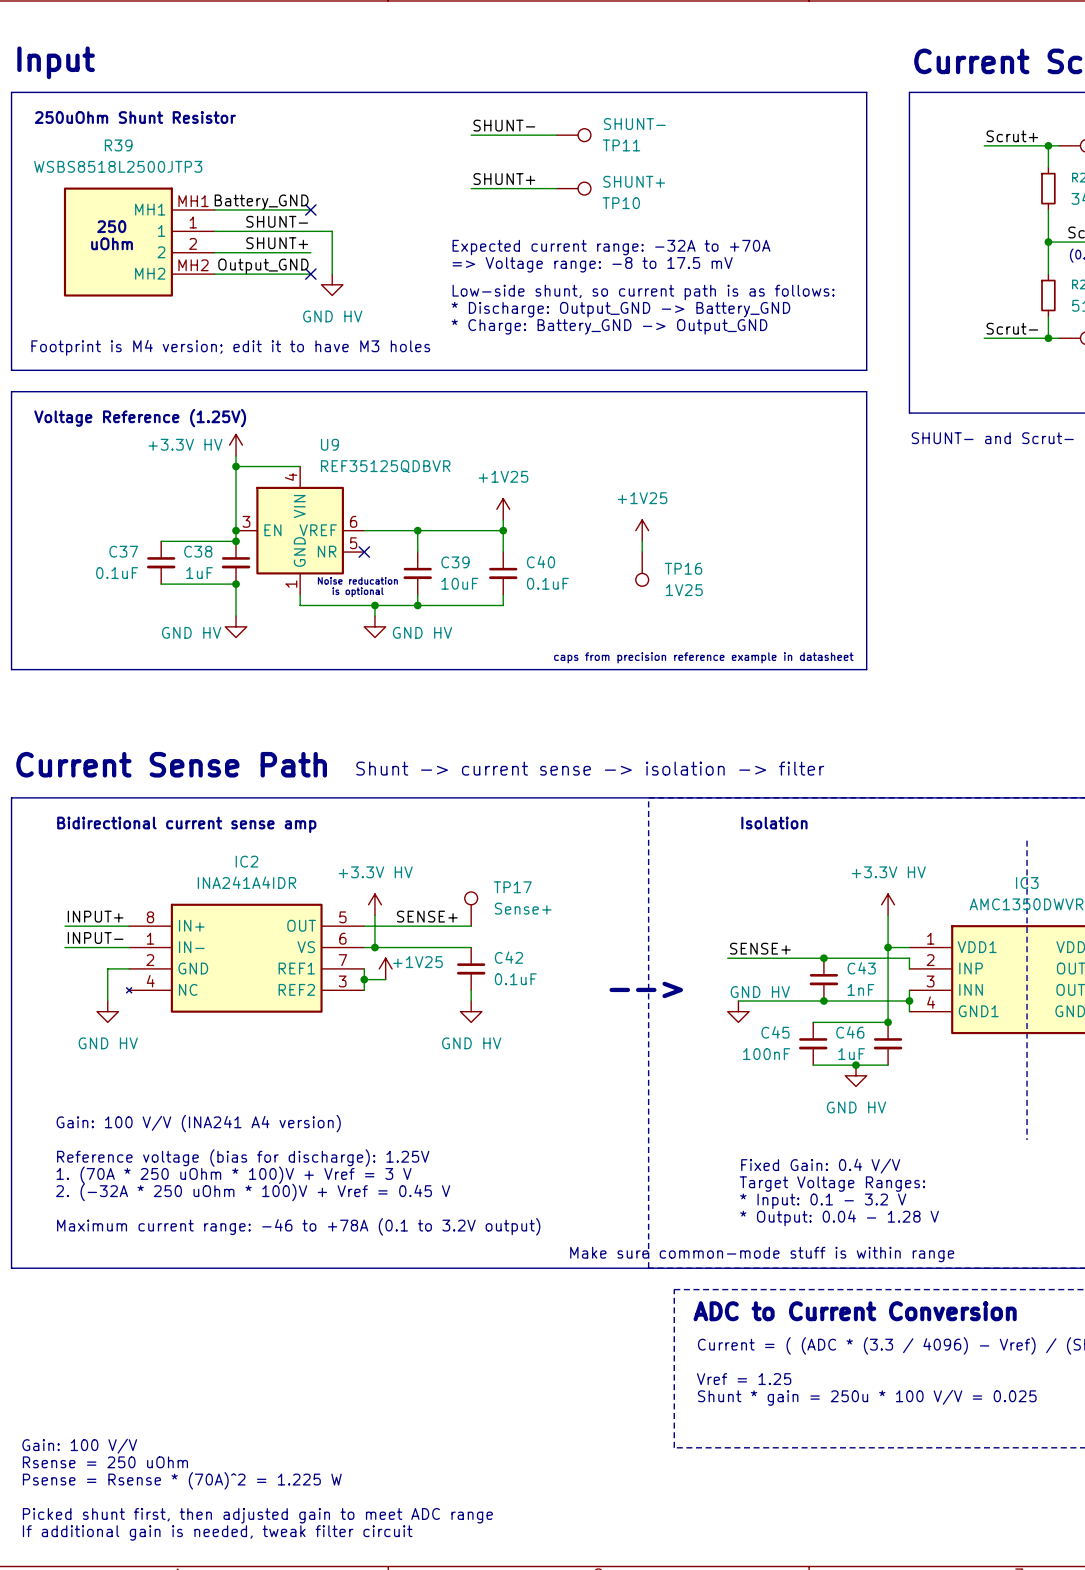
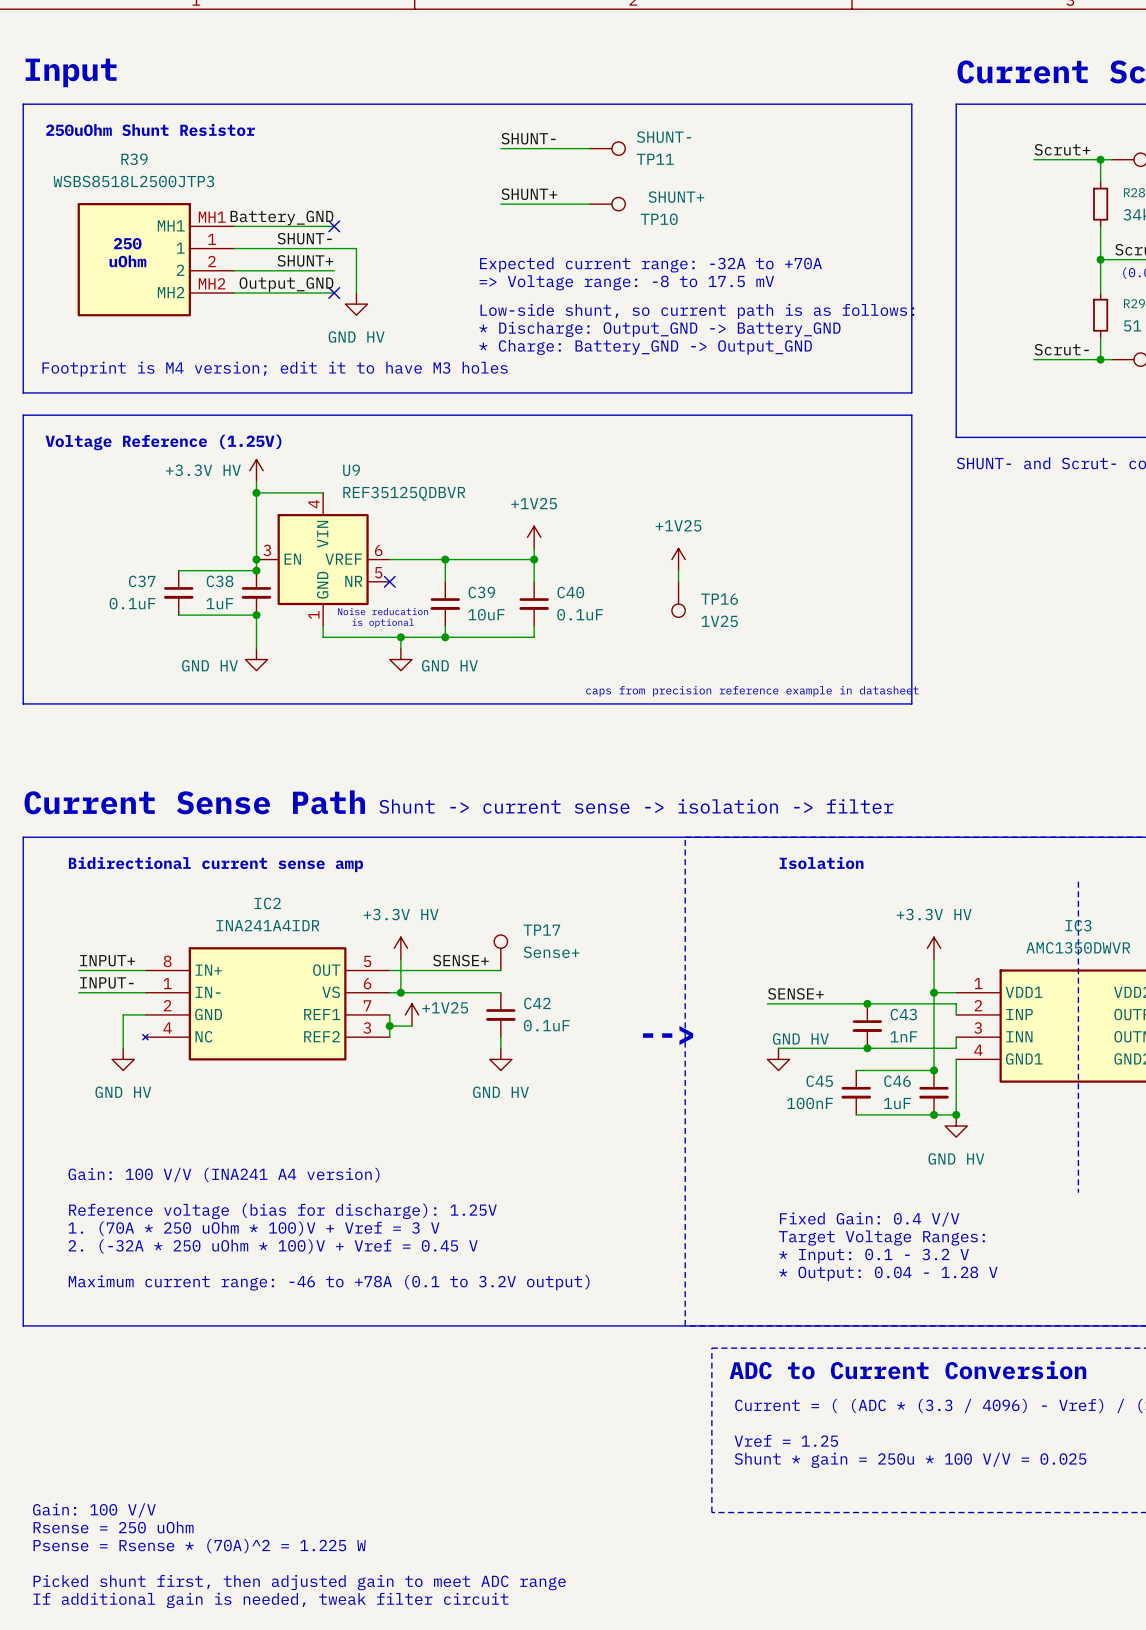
wire: (909, 1000) (909, 1011) -> (934, 1114) (956, 1114) (956, 1059)
junction: (909, 1000) -> none
junction: (855, 1065) -> none
junction: none -> (934, 1114)
junction: none -> (956, 1114)
power symbol position: GND HV (855, 1075) -> GND HV (956, 1126)
text: Make sure common-mode stuff is within range (762, 1254) -> none

